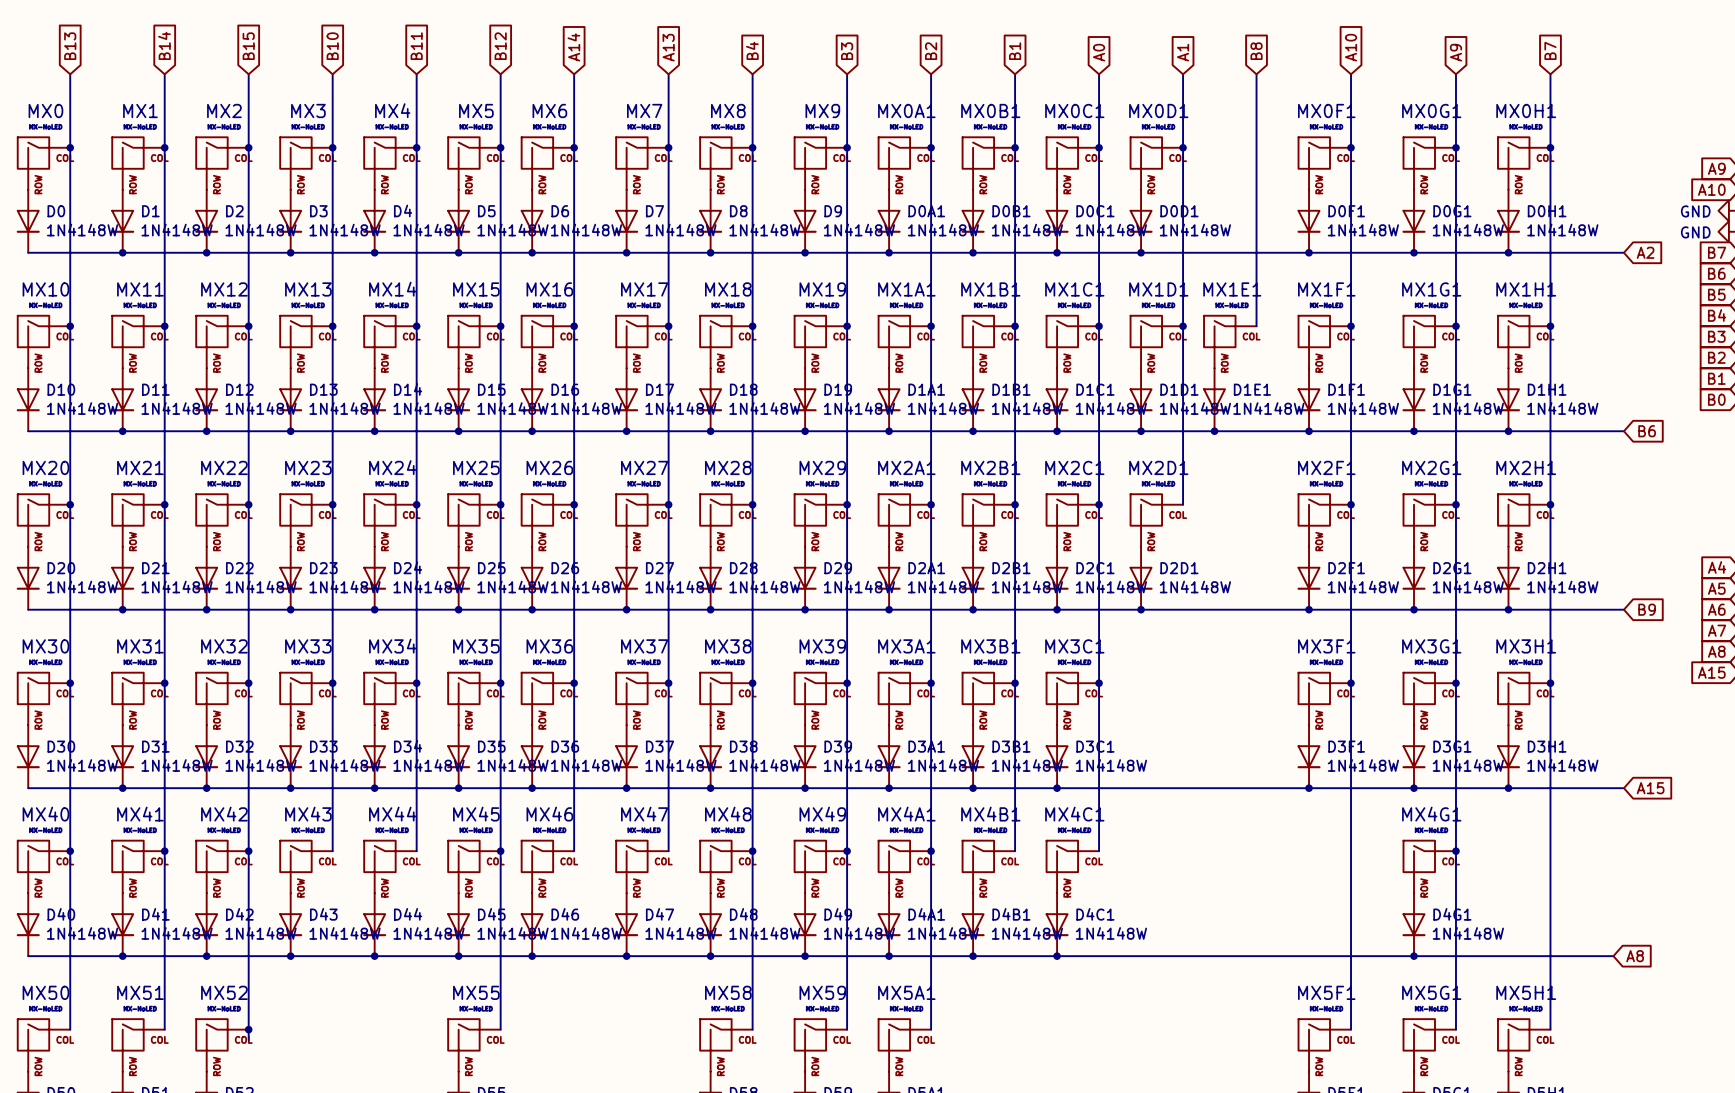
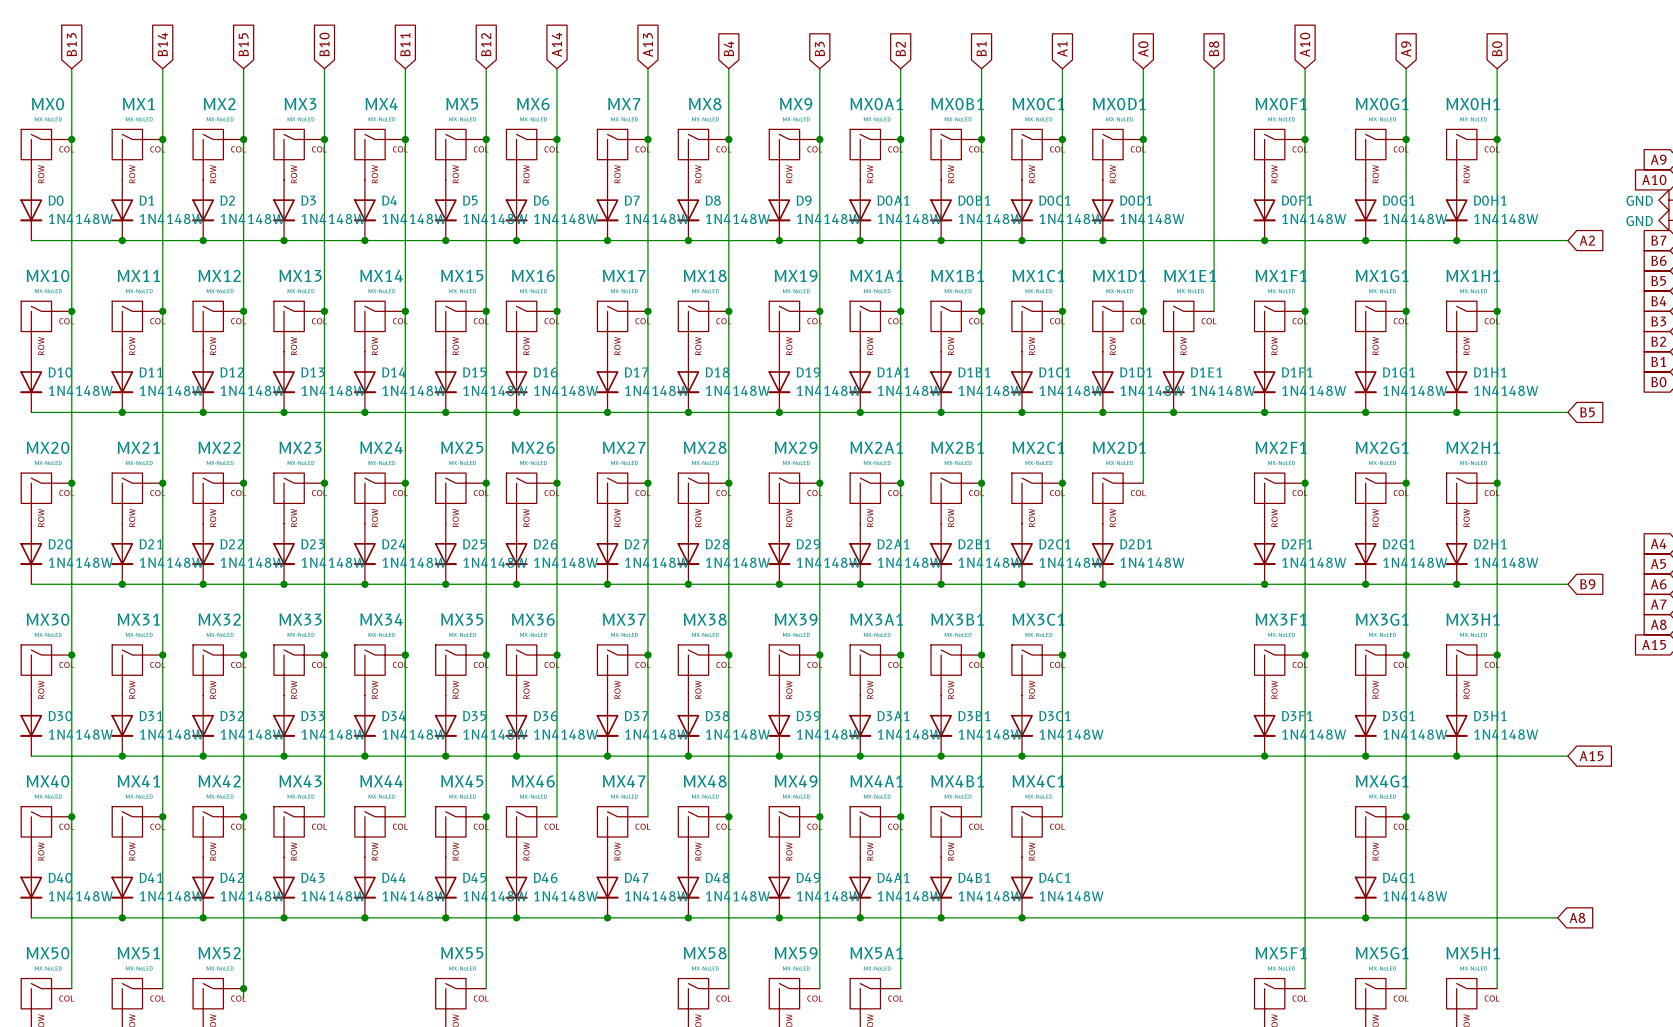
global label: B7 (1550, 50) -> B0 (1497, 48)
global label: A0 (1099, 52) -> A1 (1062, 49)
global label: A1 (1183, 52) -> A0 (1143, 49)
global label: B6 (1647, 431) -> B5 (1587, 412)

